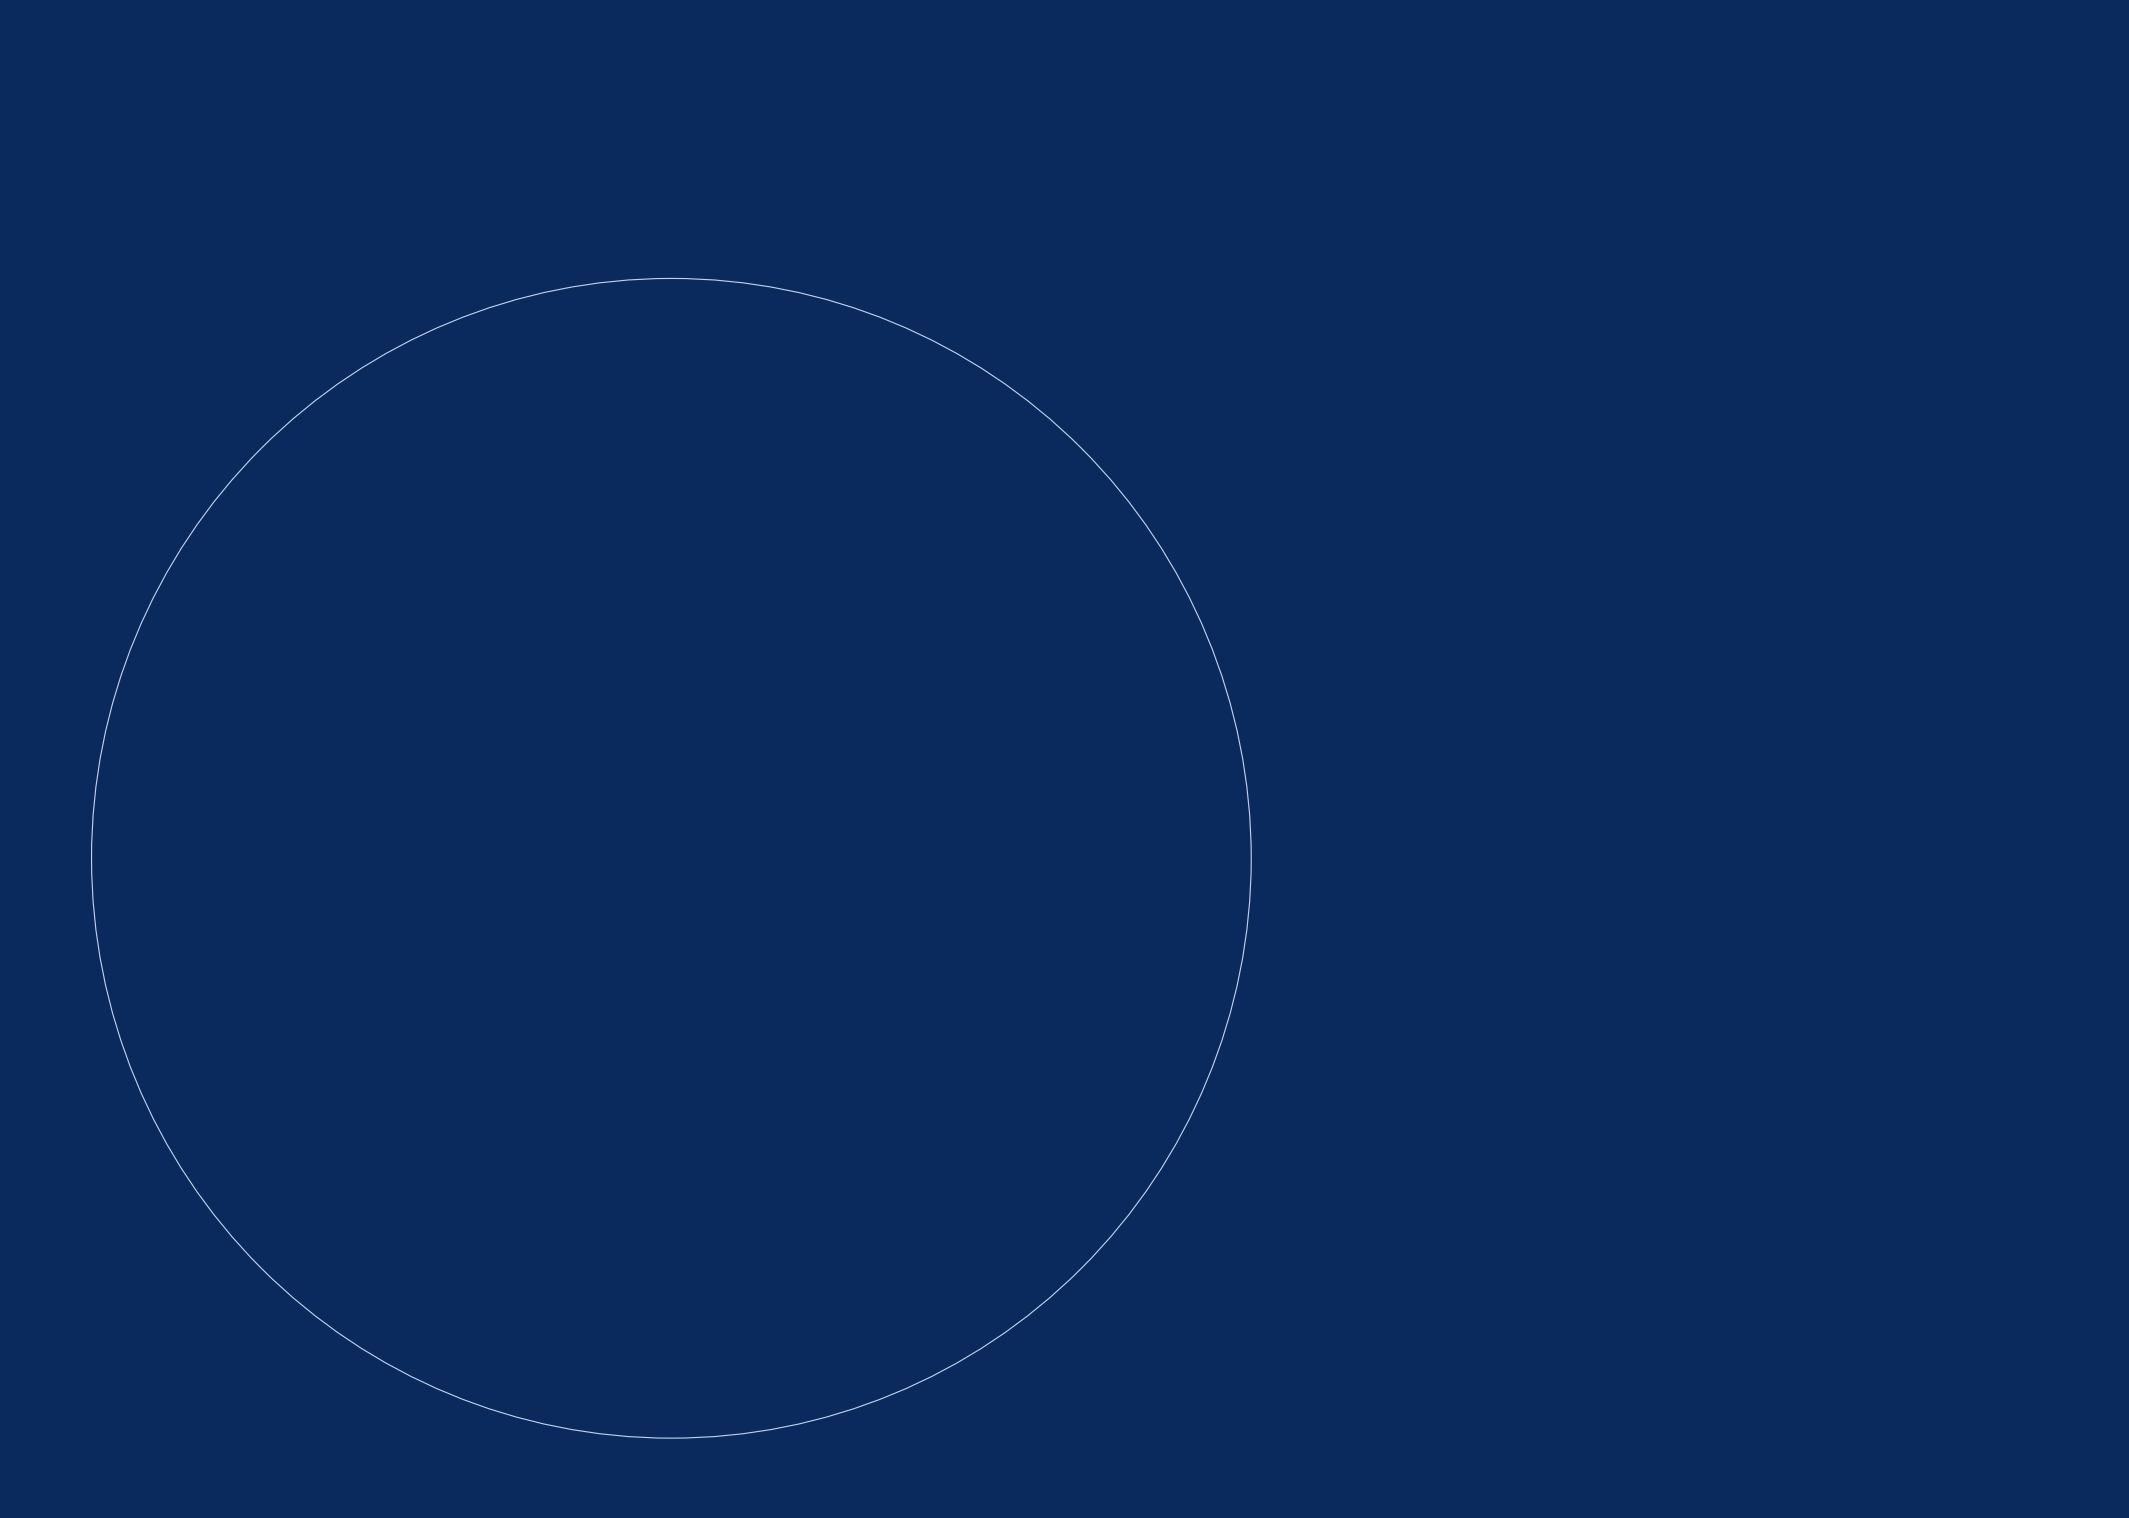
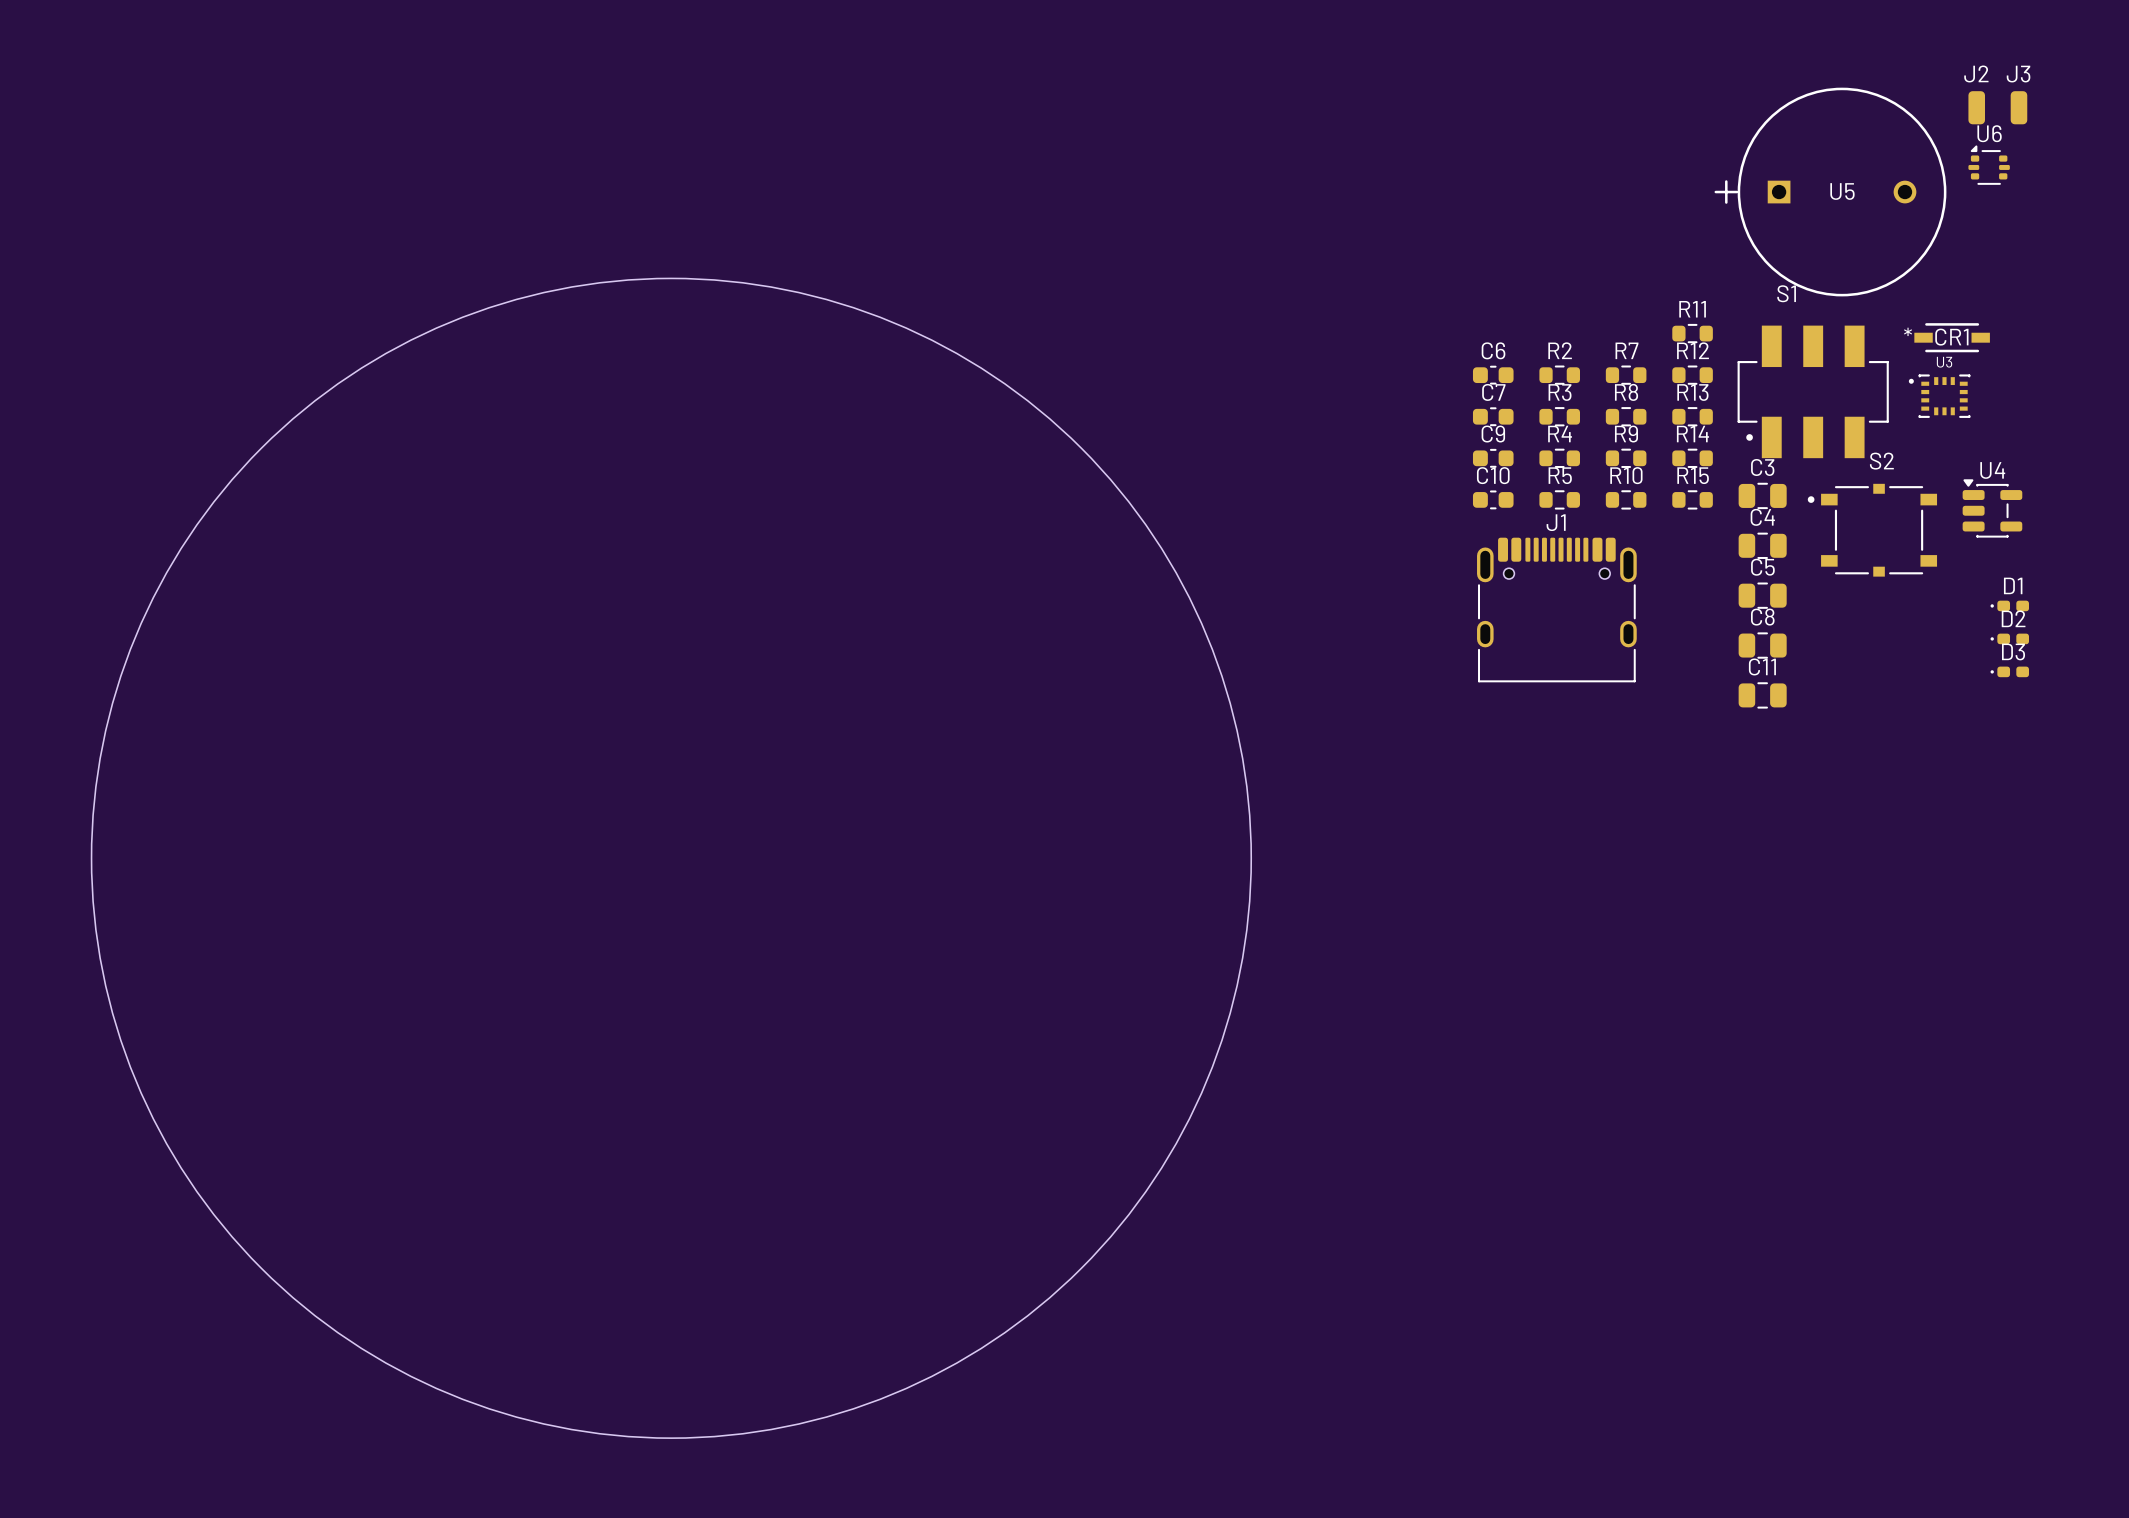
J2: none -> (1976, 107)
J3: none -> (2018, 107)
U6: none -> (1989, 165)
U5: none -> (1830, 192)
R11: none -> (1692, 333)
CR1: none -> (1952, 337)
C6: none -> (1493, 375)
R2: none -> (1559, 375)
R7: none -> (1626, 375)
R12: none -> (1692, 375)
S1: none -> (1813, 391)
U3: none -> (1939, 396)
C7: none -> (1493, 416)
R3: none -> (1559, 416)
R8: none -> (1626, 416)
R13: none -> (1692, 416)
C9: none -> (1493, 458)
R4: none -> (1559, 458)
R9: none -> (1626, 458)
R14: none -> (1692, 458)
C3: none -> (1762, 495)
C10: none -> (1493, 499)
R5: none -> (1559, 499)
R10: none -> (1626, 499)
R15: none -> (1692, 499)
U4: none -> (1992, 508)
S2: none -> (1872, 530)
C4: none -> (1762, 545)
C5: none -> (1762, 595)
D1: none -> (2009, 605)
J1: none -> (1556, 610)
D2: none -> (2009, 638)
C8: none -> (1762, 645)
D3: none -> (2009, 671)
C11: none -> (1762, 695)

